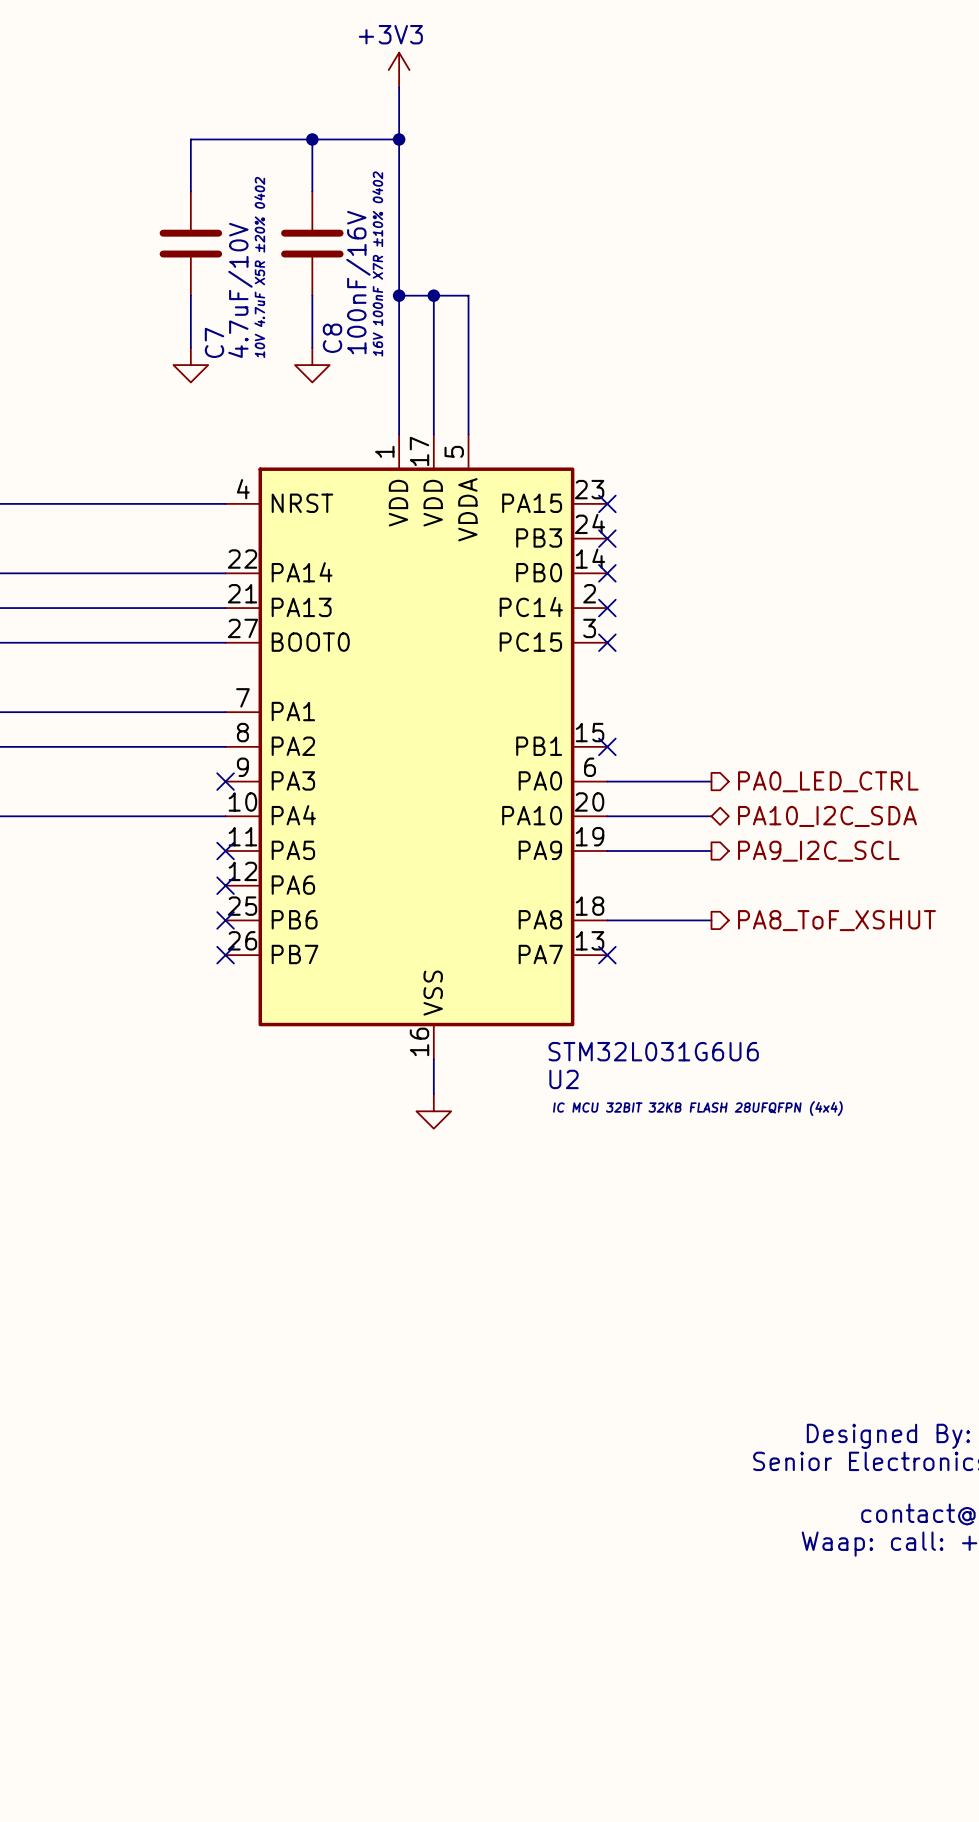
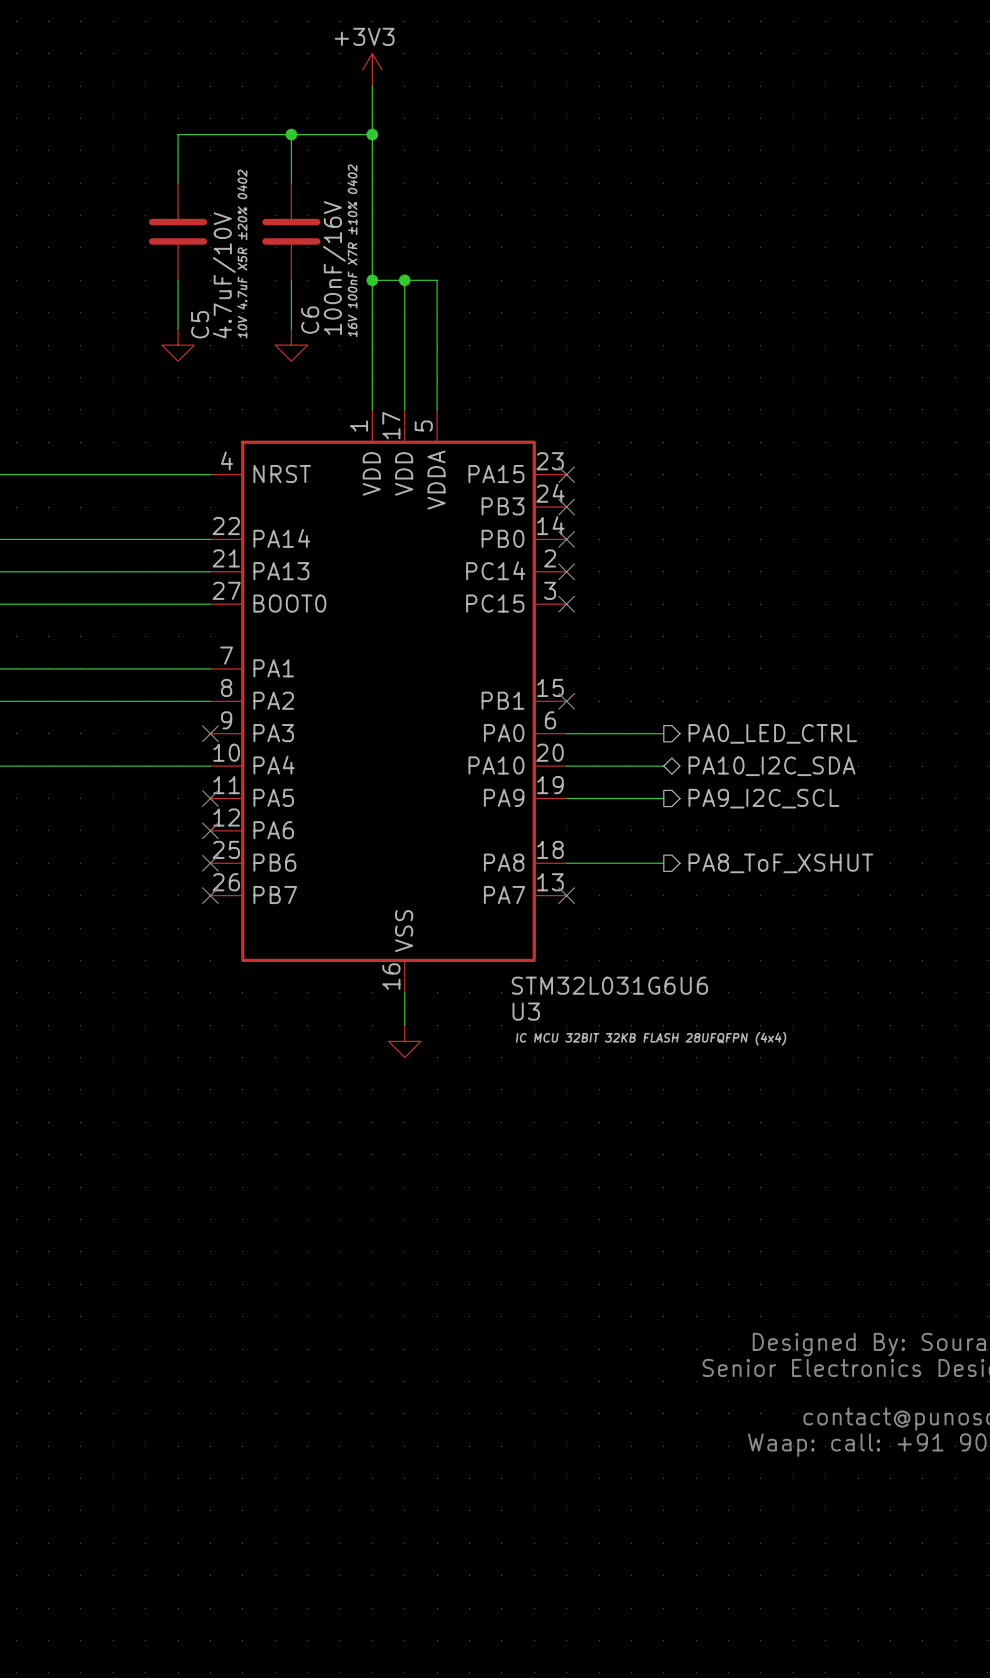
C8 name: C8 (332, 338) -> C6 (310, 320)
C7 name: C7 (214, 342) -> C5 (200, 324)
U2 name: U2 (564, 1079) -> U3 (526, 1011)

